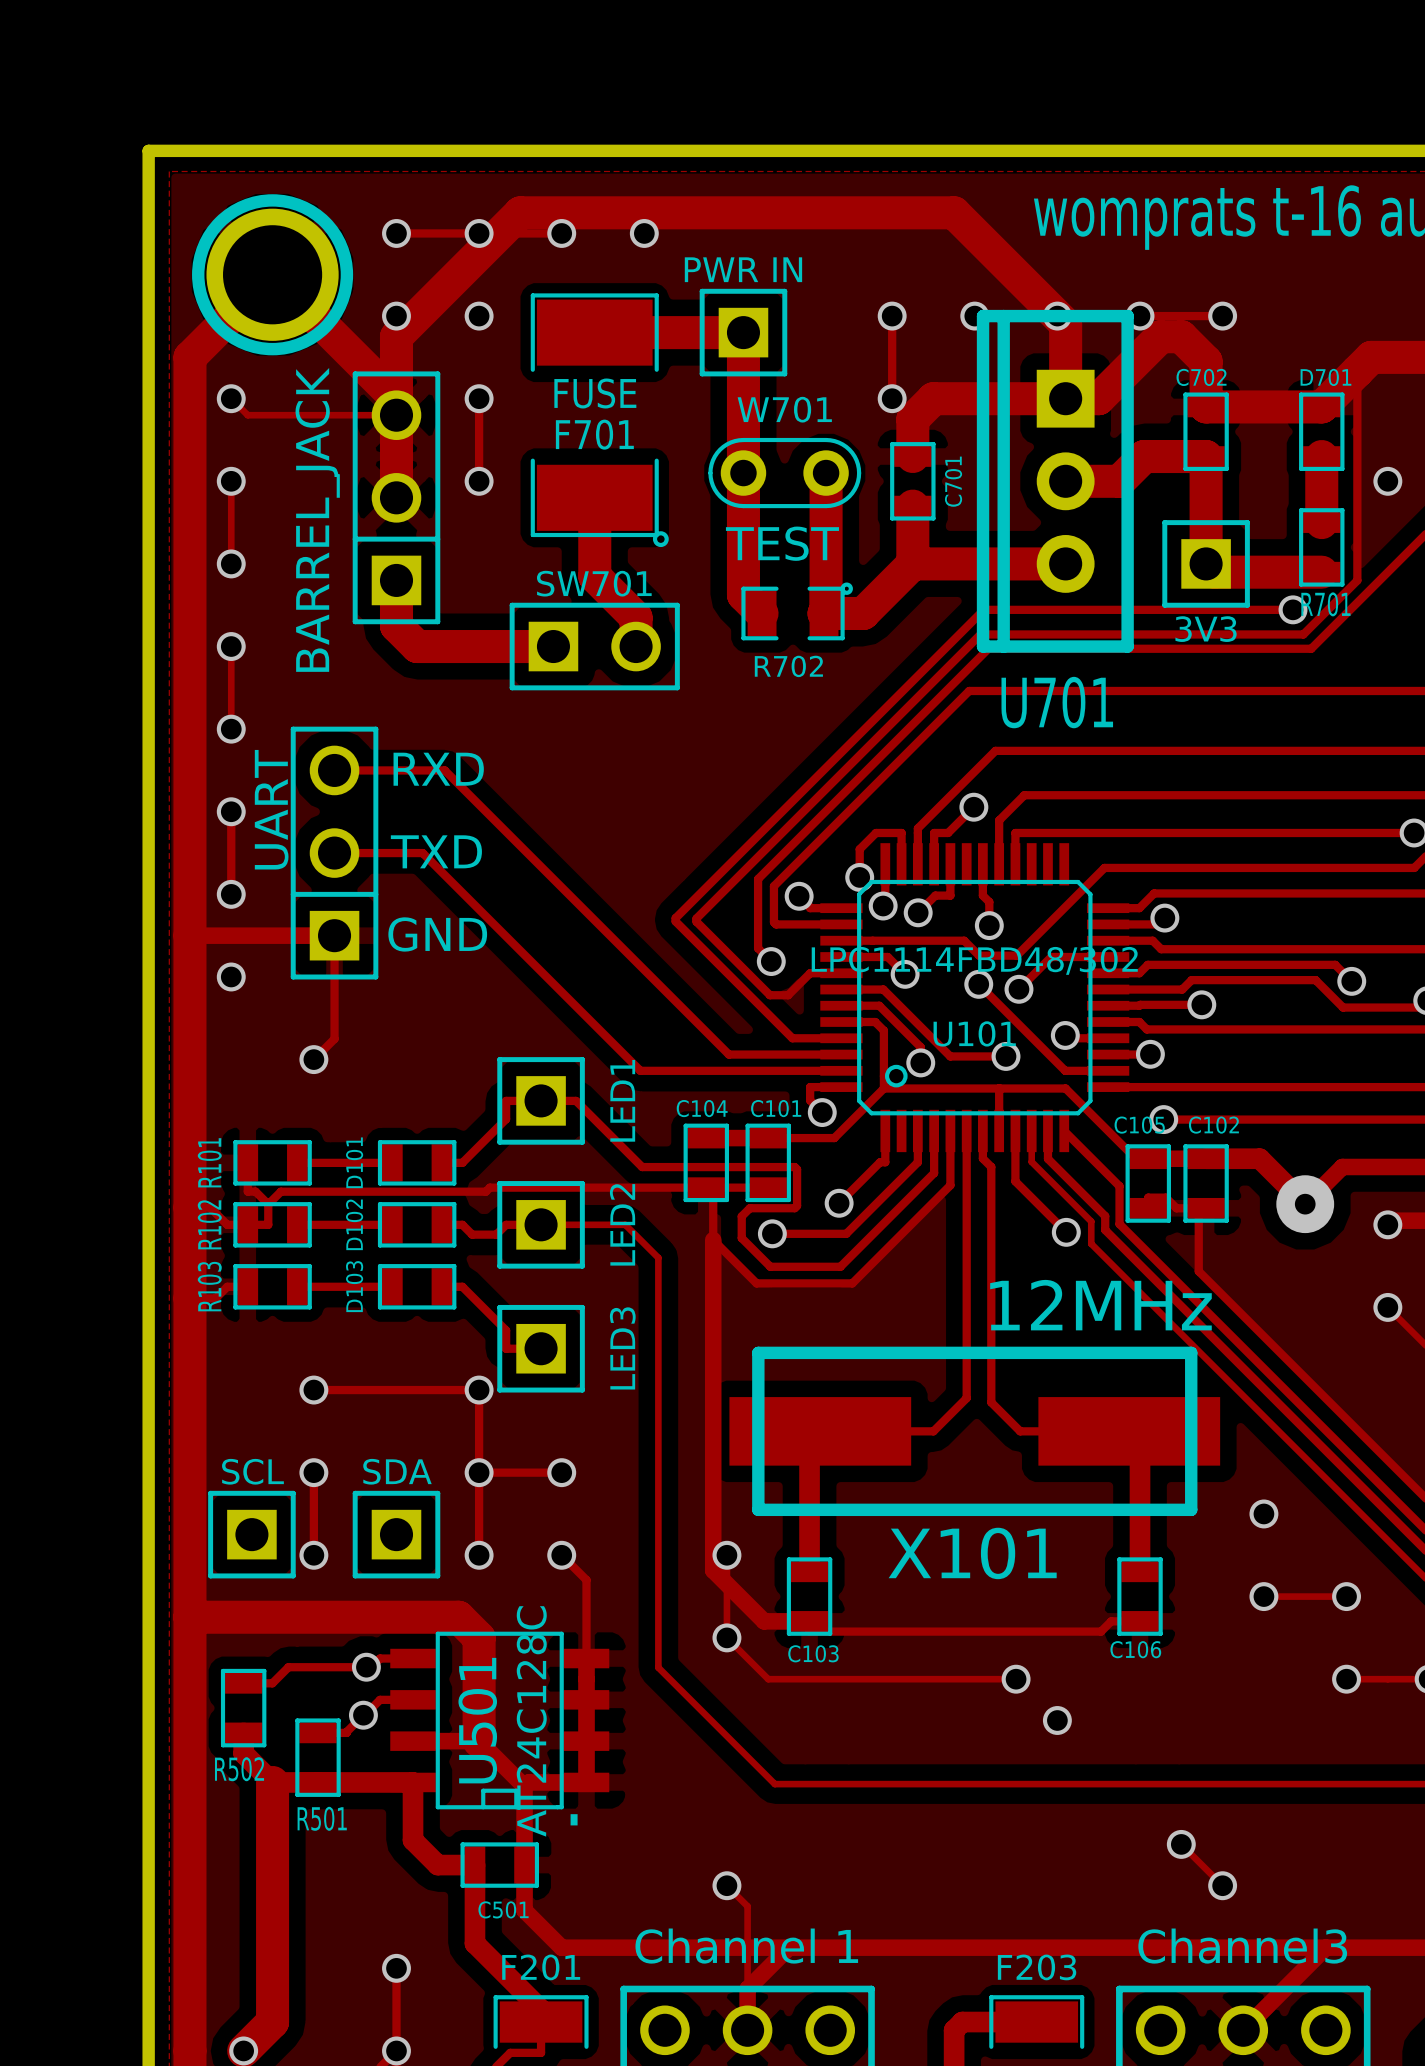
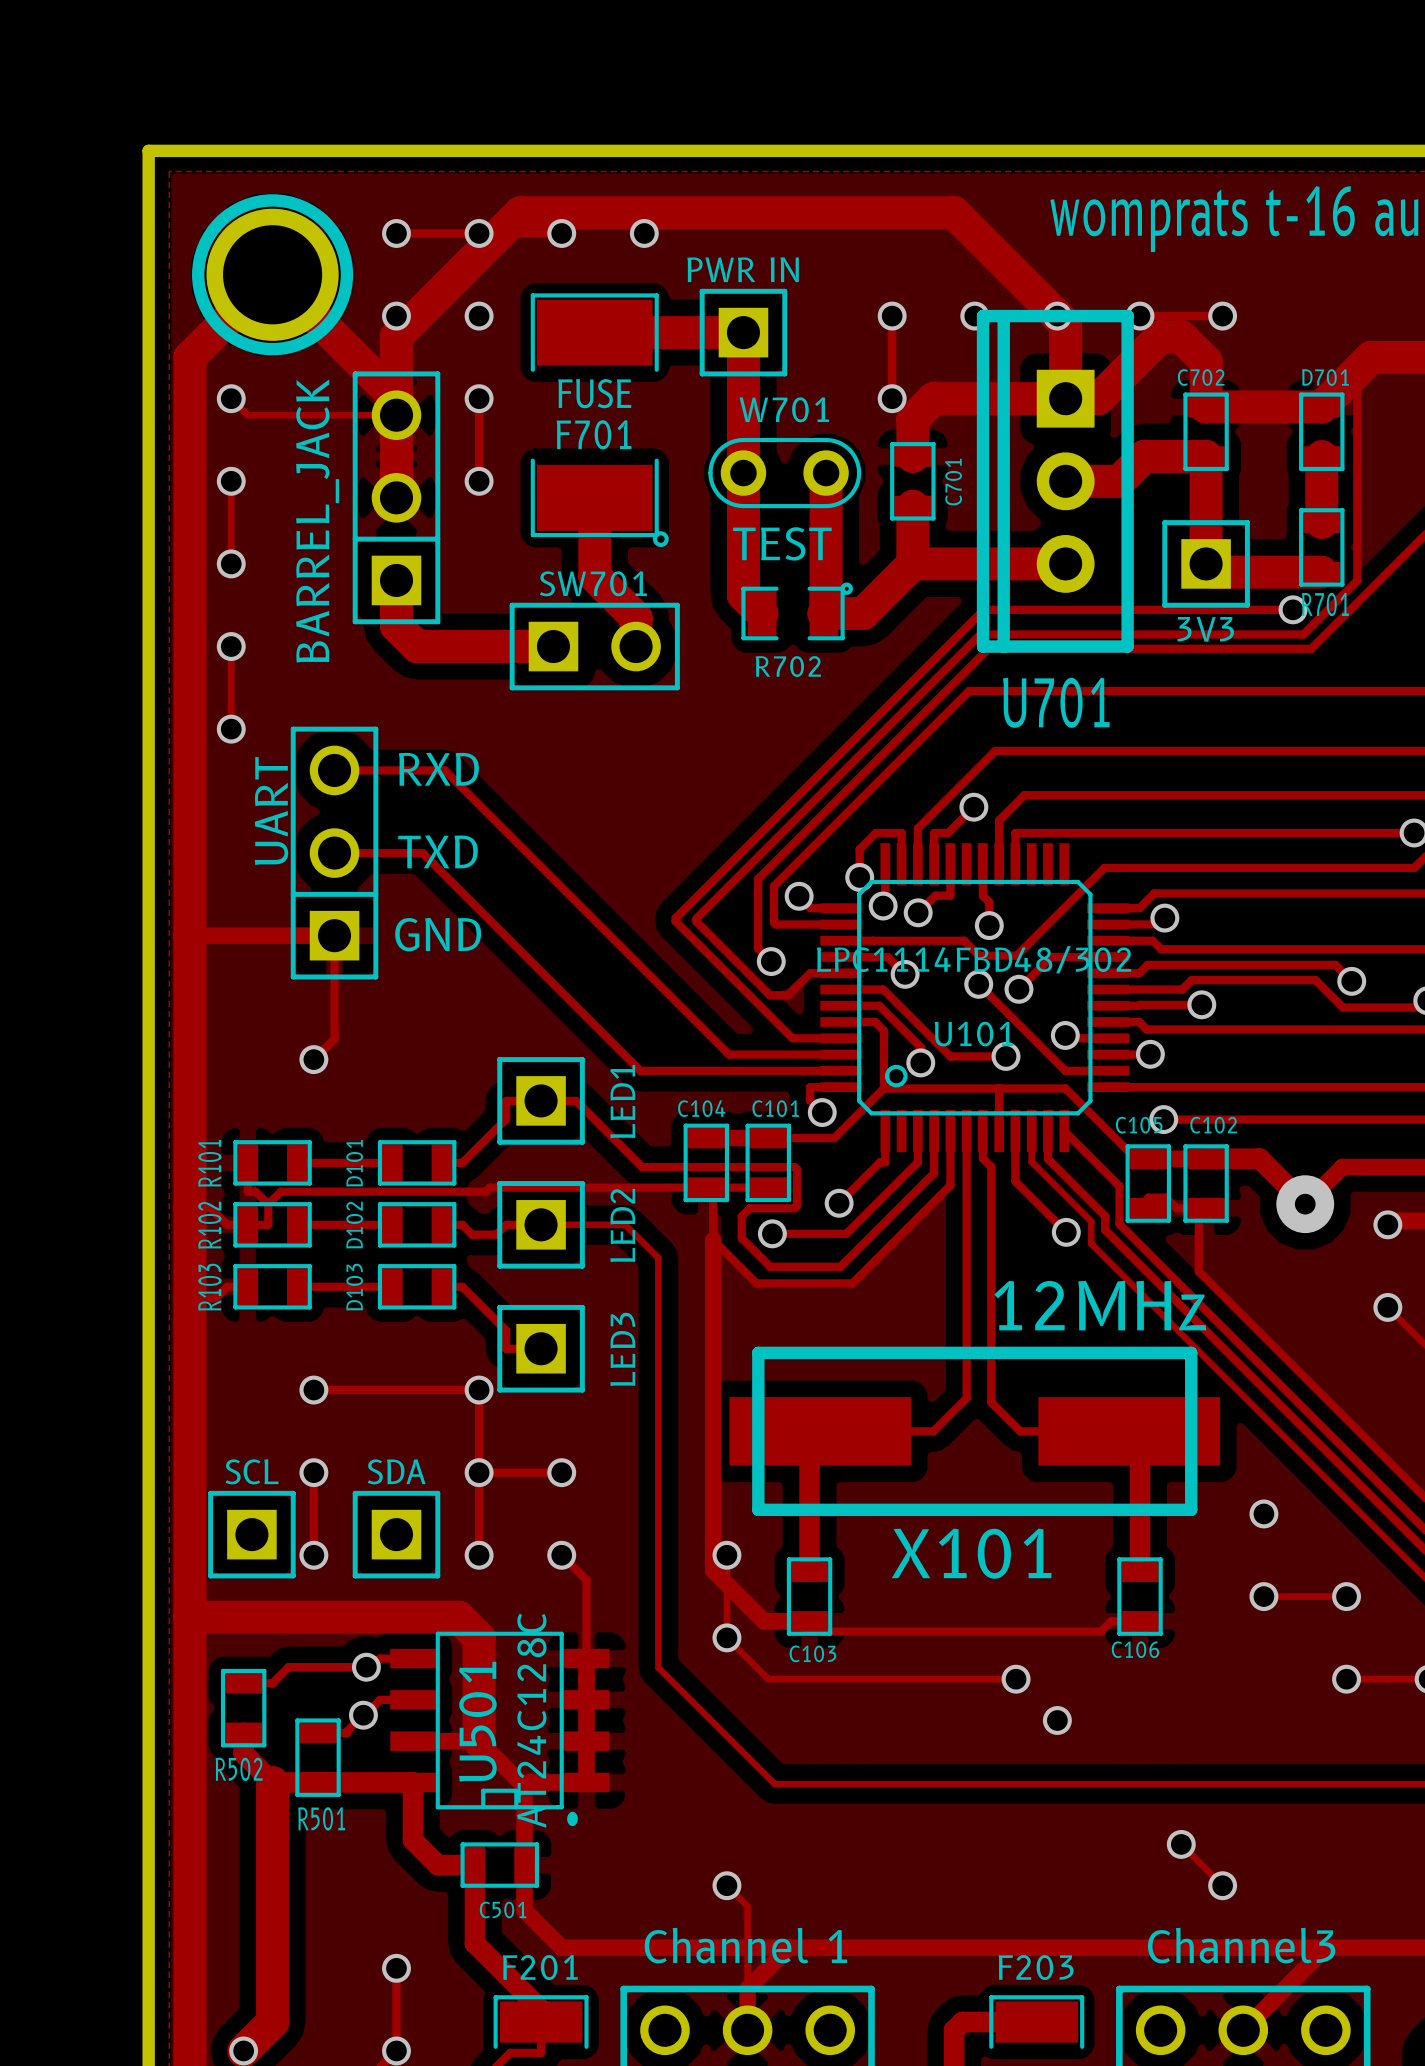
via: (1387, 481) -> none
track: (231, 811) (231, 894) -> none
via: (231, 811) -> none
via: (231, 894) -> none
via: (231, 976) -> none

